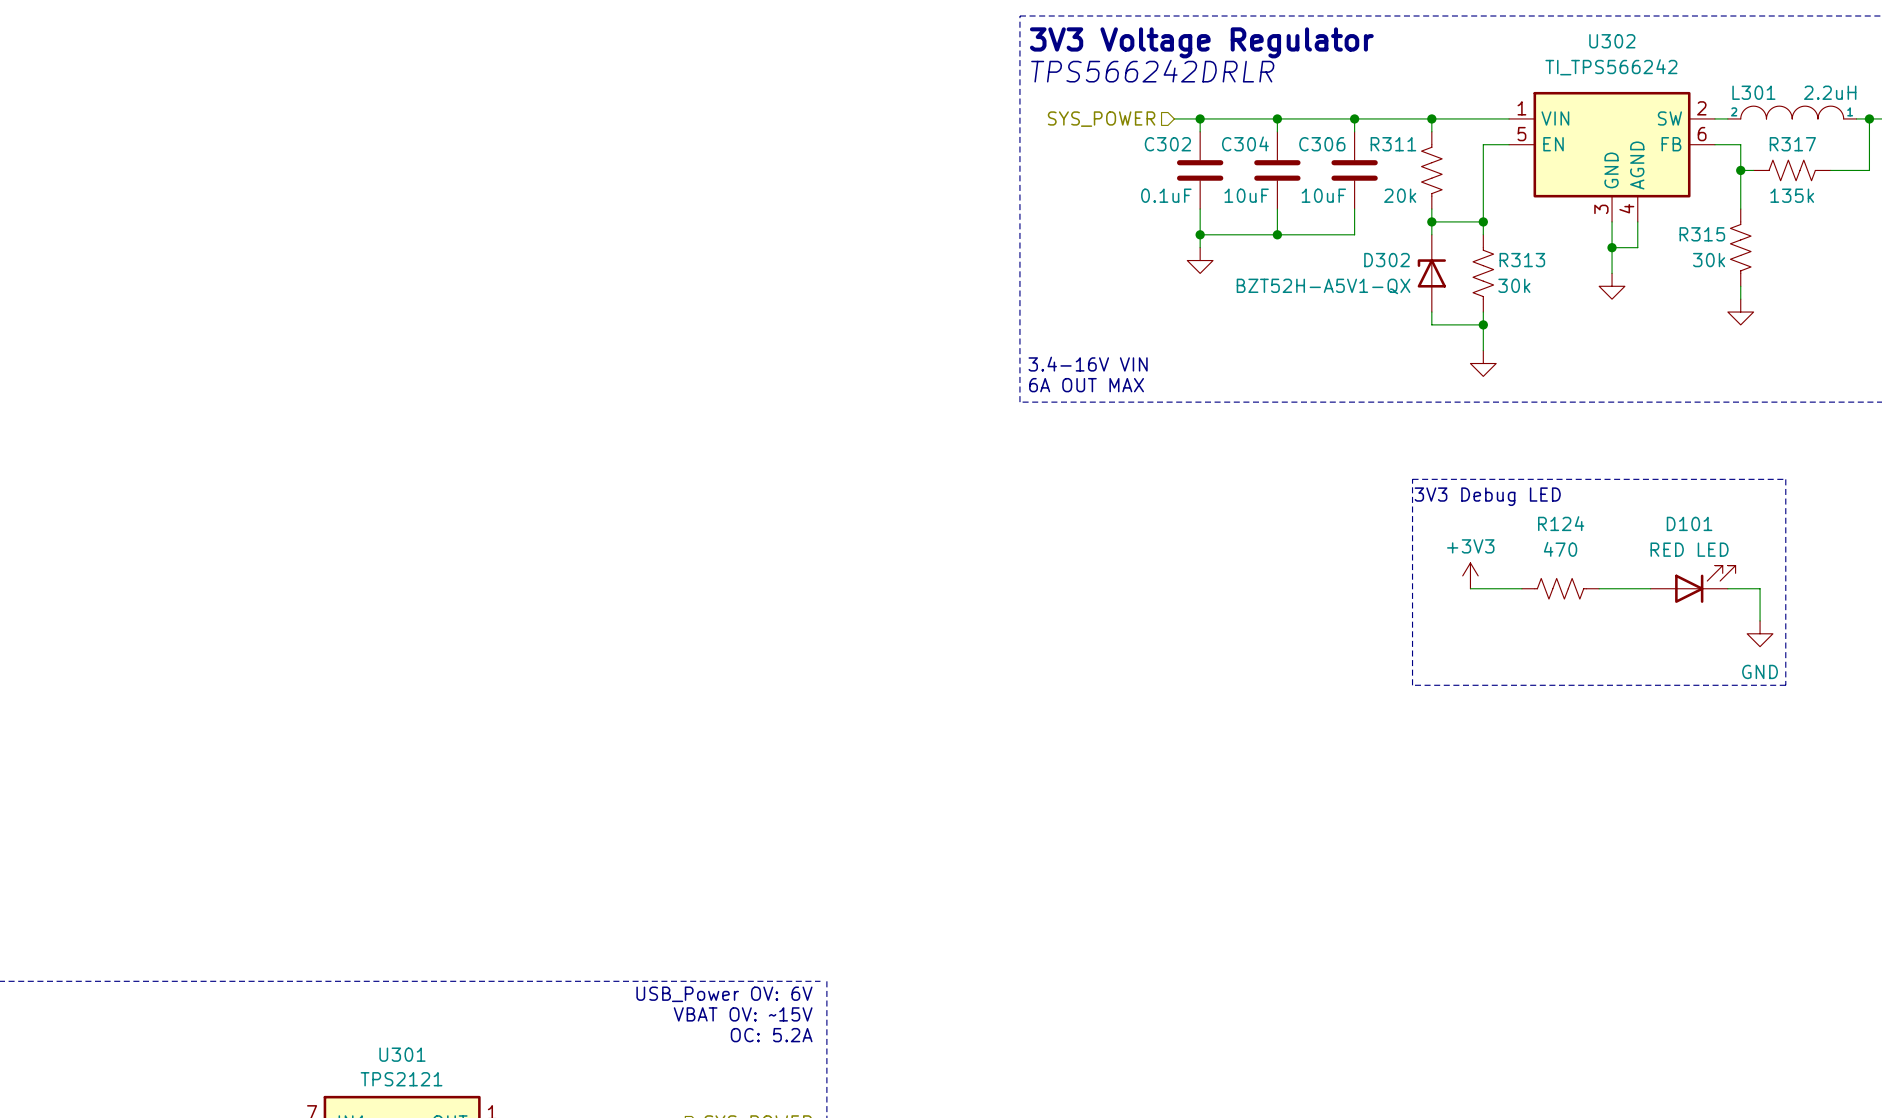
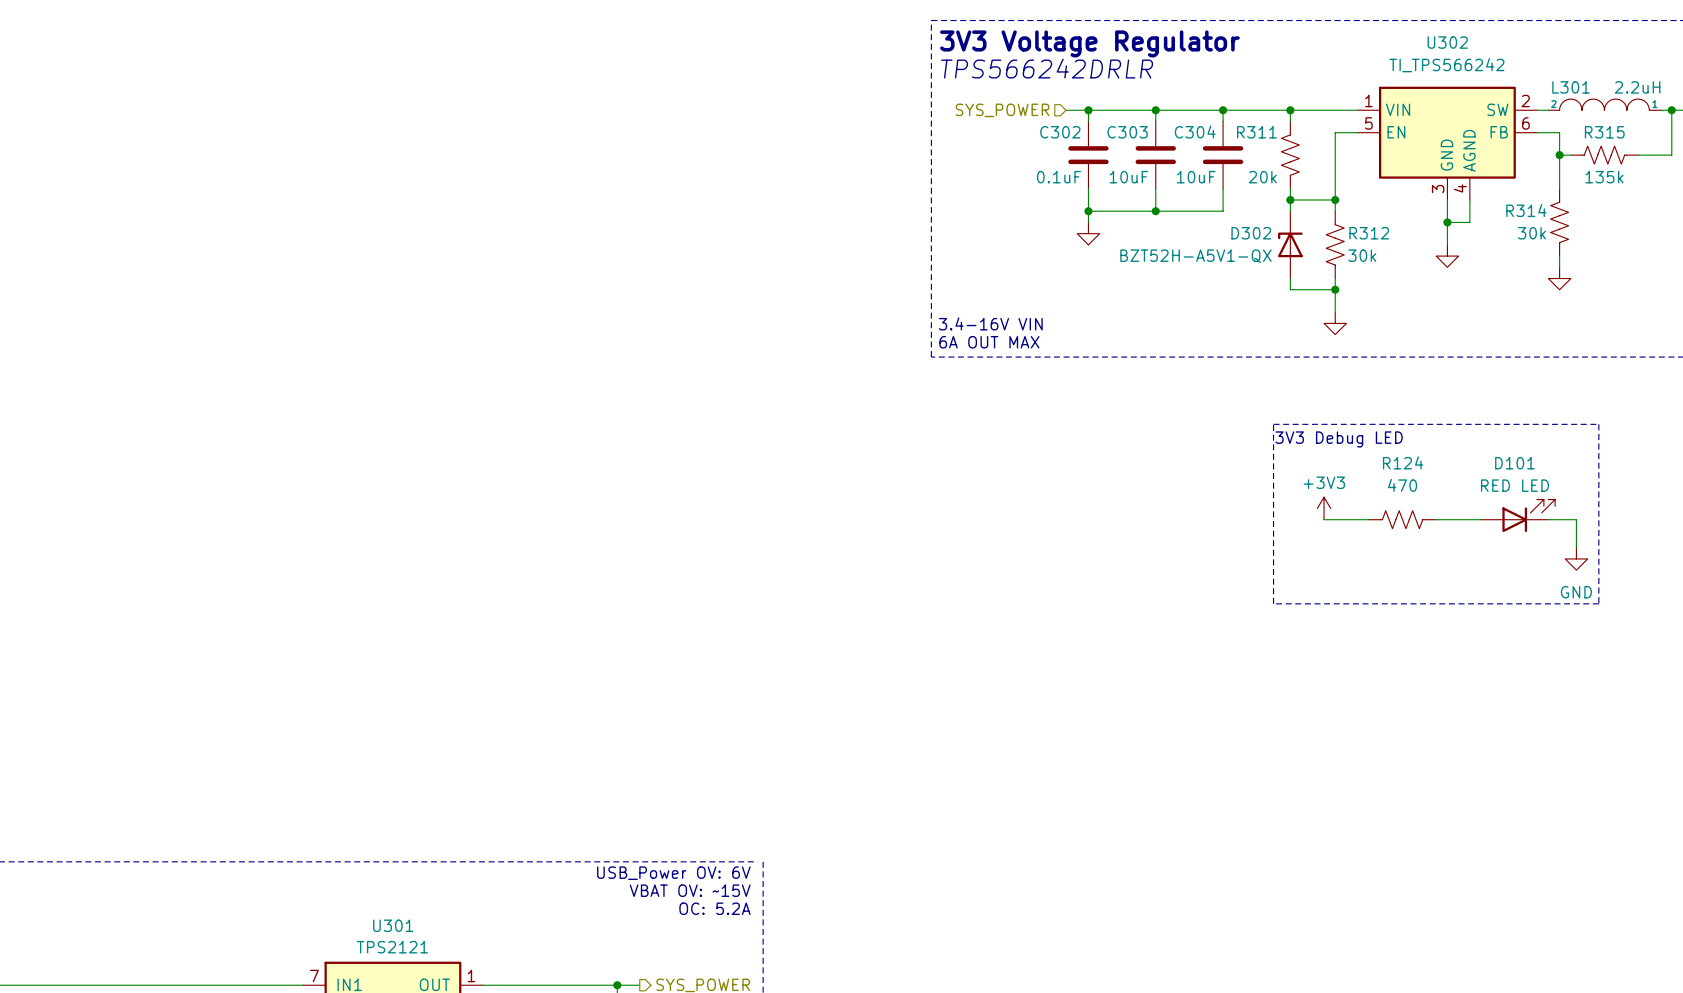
C304 name: C304 (1245, 143) -> C303 (1127, 132)
C306 name: C306 (1322, 144) -> C304 (1195, 132)
R317 name: R317 (1792, 144) -> R315 (1604, 132)
R315 name: R315 (1702, 234) -> R314 (1526, 210)
R313 name: R313 (1522, 260) -> R312 (1369, 233)

